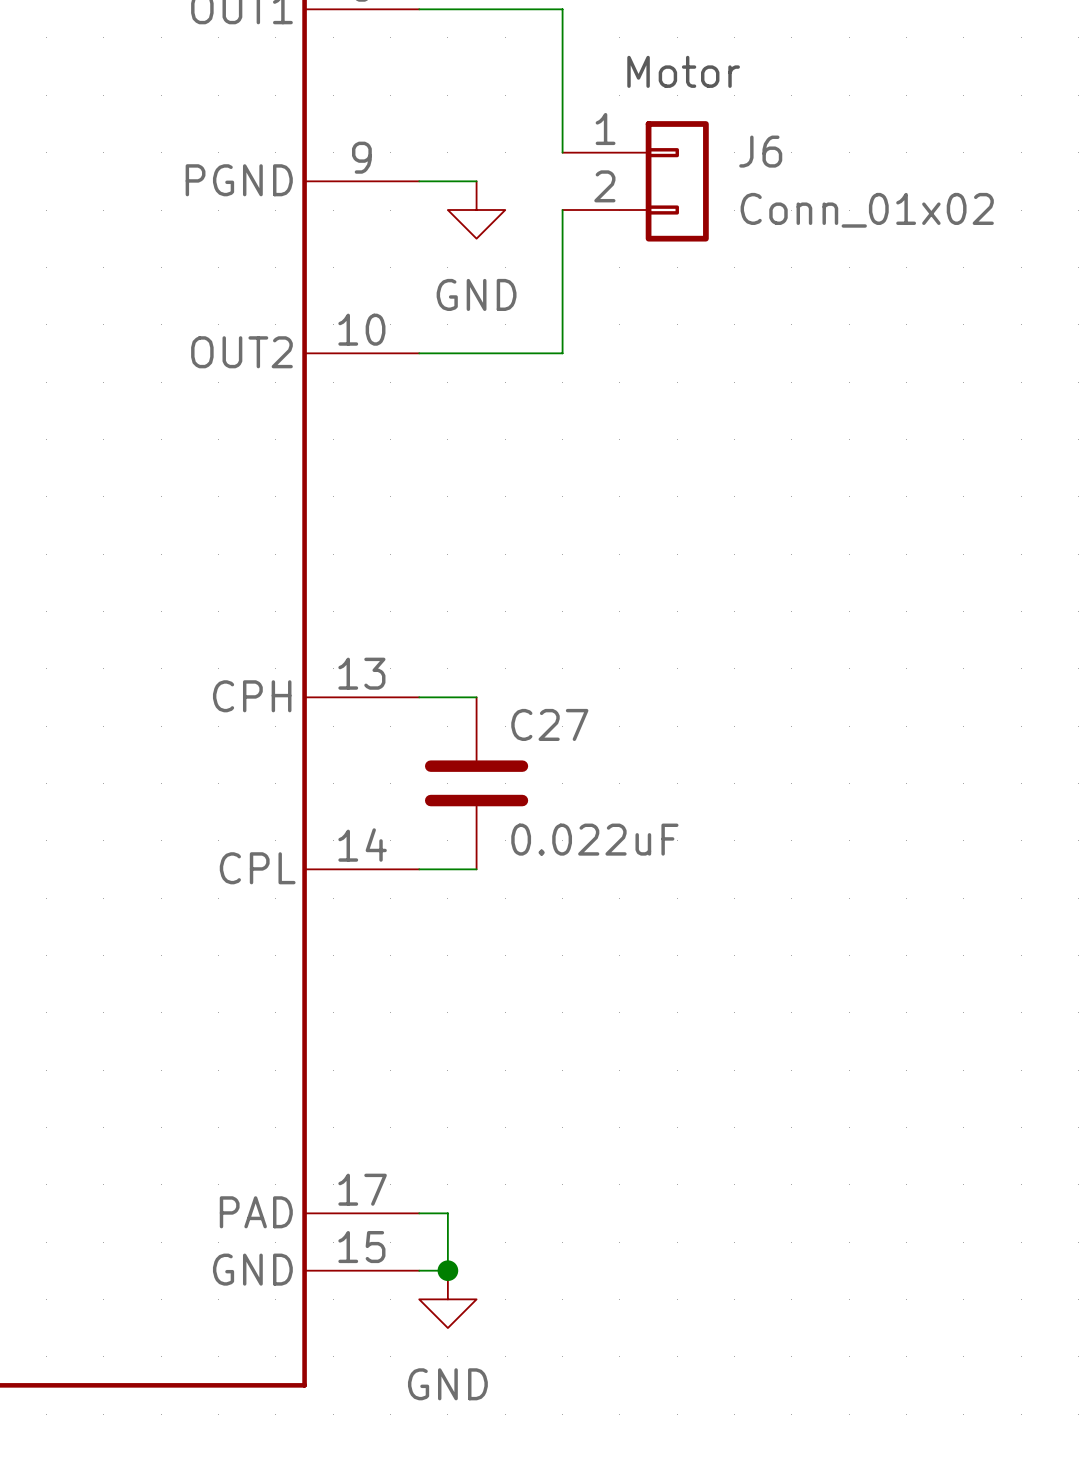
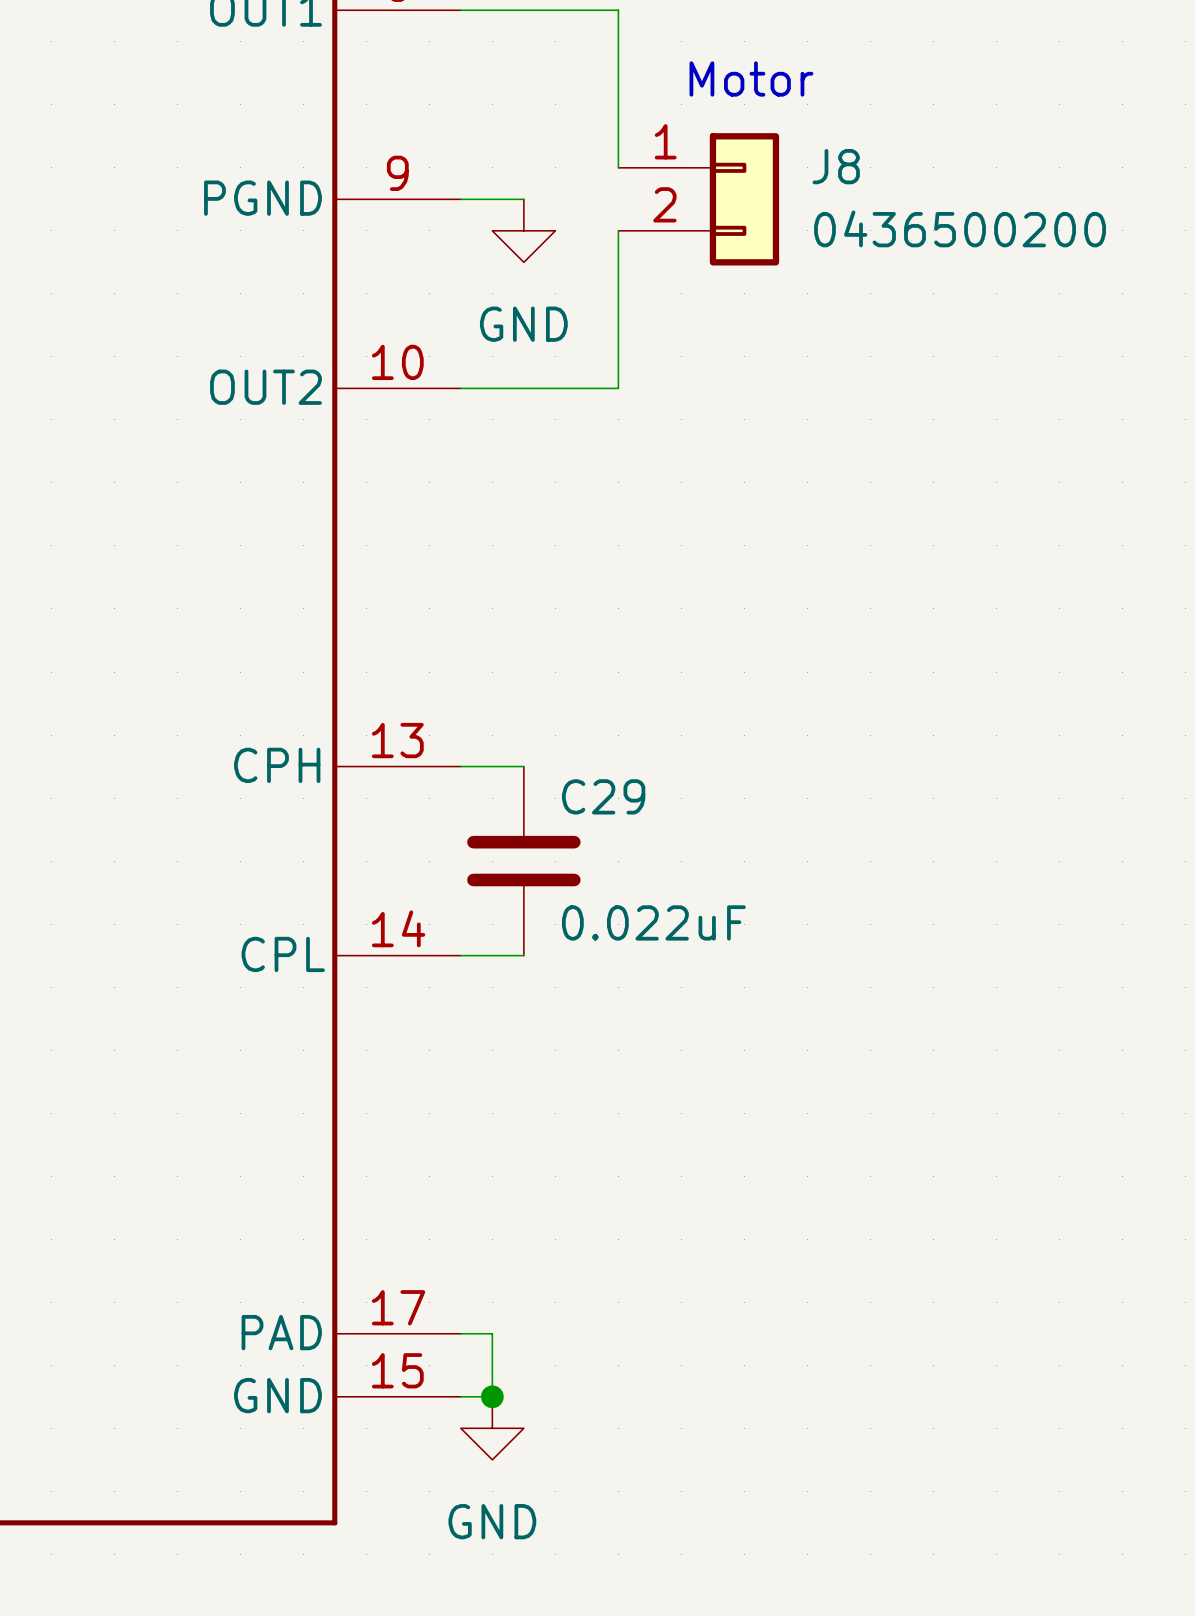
J6 name: J6 (760, 151) -> J8 (836, 166)
J6 value: Conn_01x02 (867, 210) -> 0436500200 (960, 228)
C27 name: C27 (549, 724) -> C29 (603, 796)

